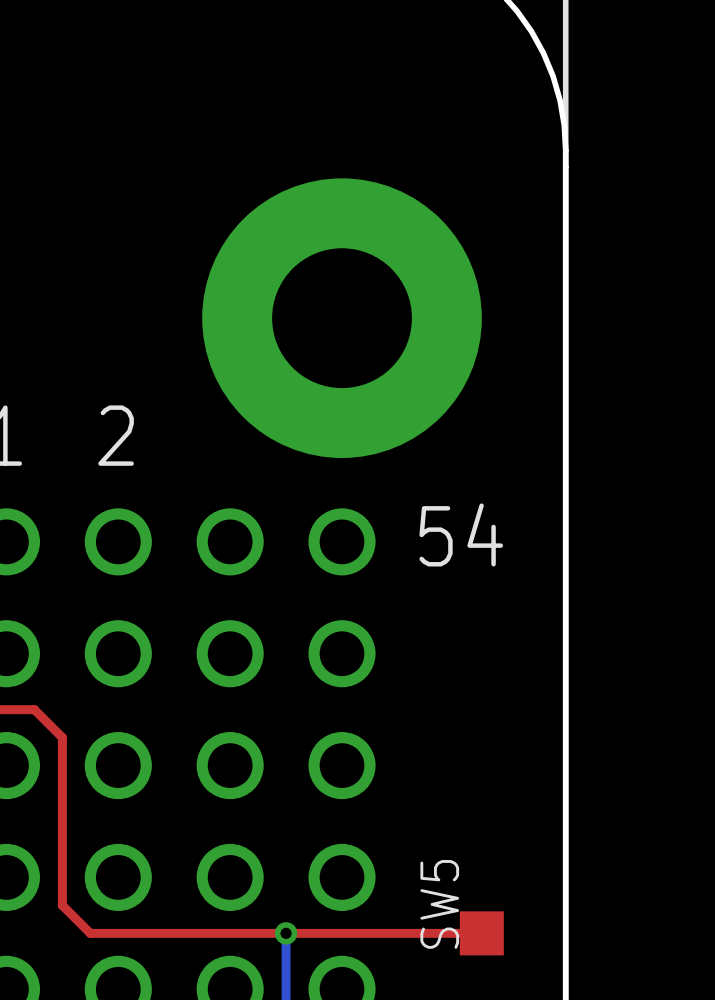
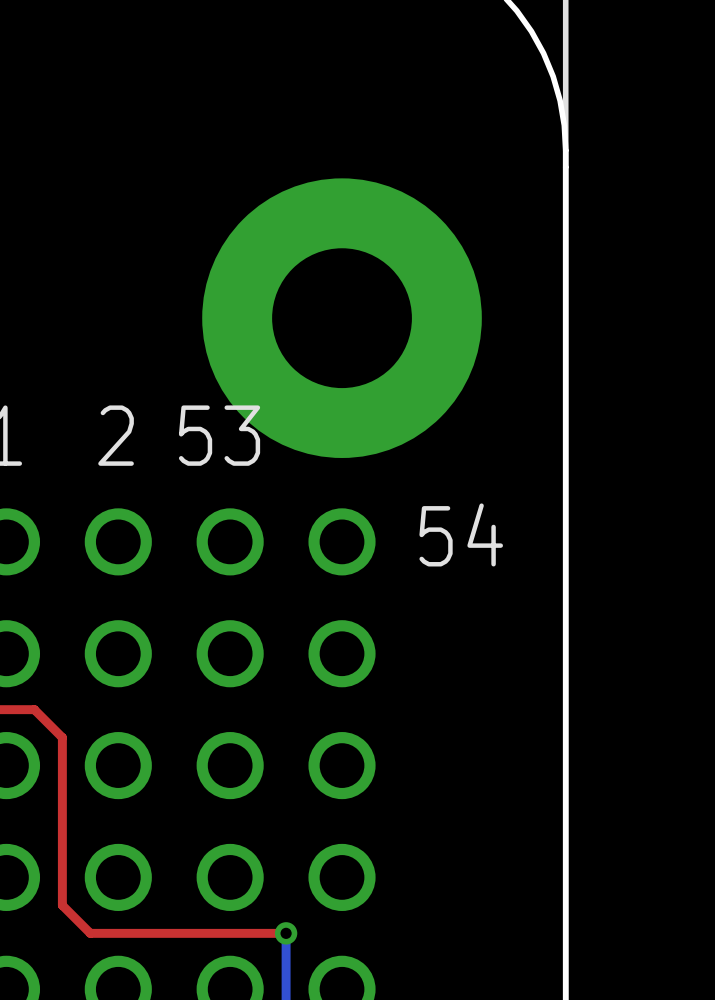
part text: none -> 53 (219, 435)
top track: (286, 933) (481, 933) -> none
SW5: (481, 933) -> none

